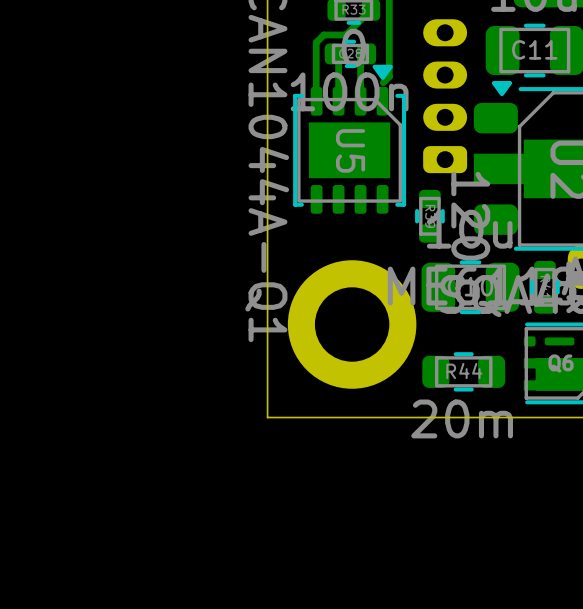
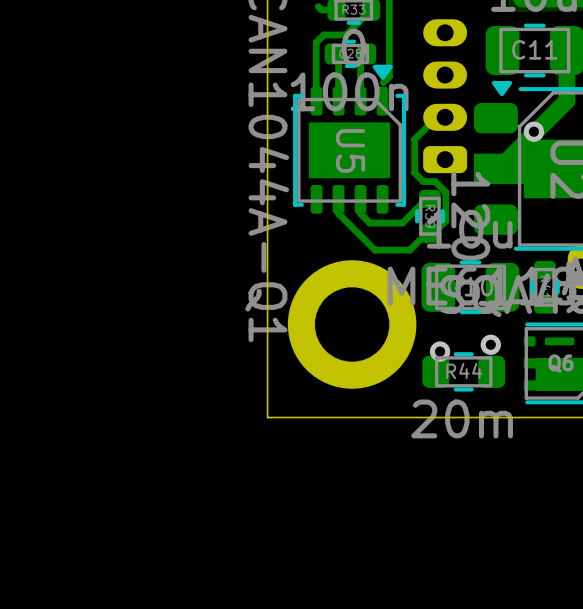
track: none -> (318, 6) (321, 9) (336, 9)
track: none -> (566, 50) (566, 100) (498, 168)
track: none -> (436, 117) (414, 139) (414, 172) (423, 181) (435, 181) (445, 192) (445, 221) (426, 240)
via: none -> (533, 131)
track: none -> (338, 199) (338, 213) (374, 250) (409, 250) (426, 233)
track: none -> (426, 199) (402, 223) (369, 223) (360, 213) (360, 199)
via: none -> (490, 344)
via: none -> (440, 351)

